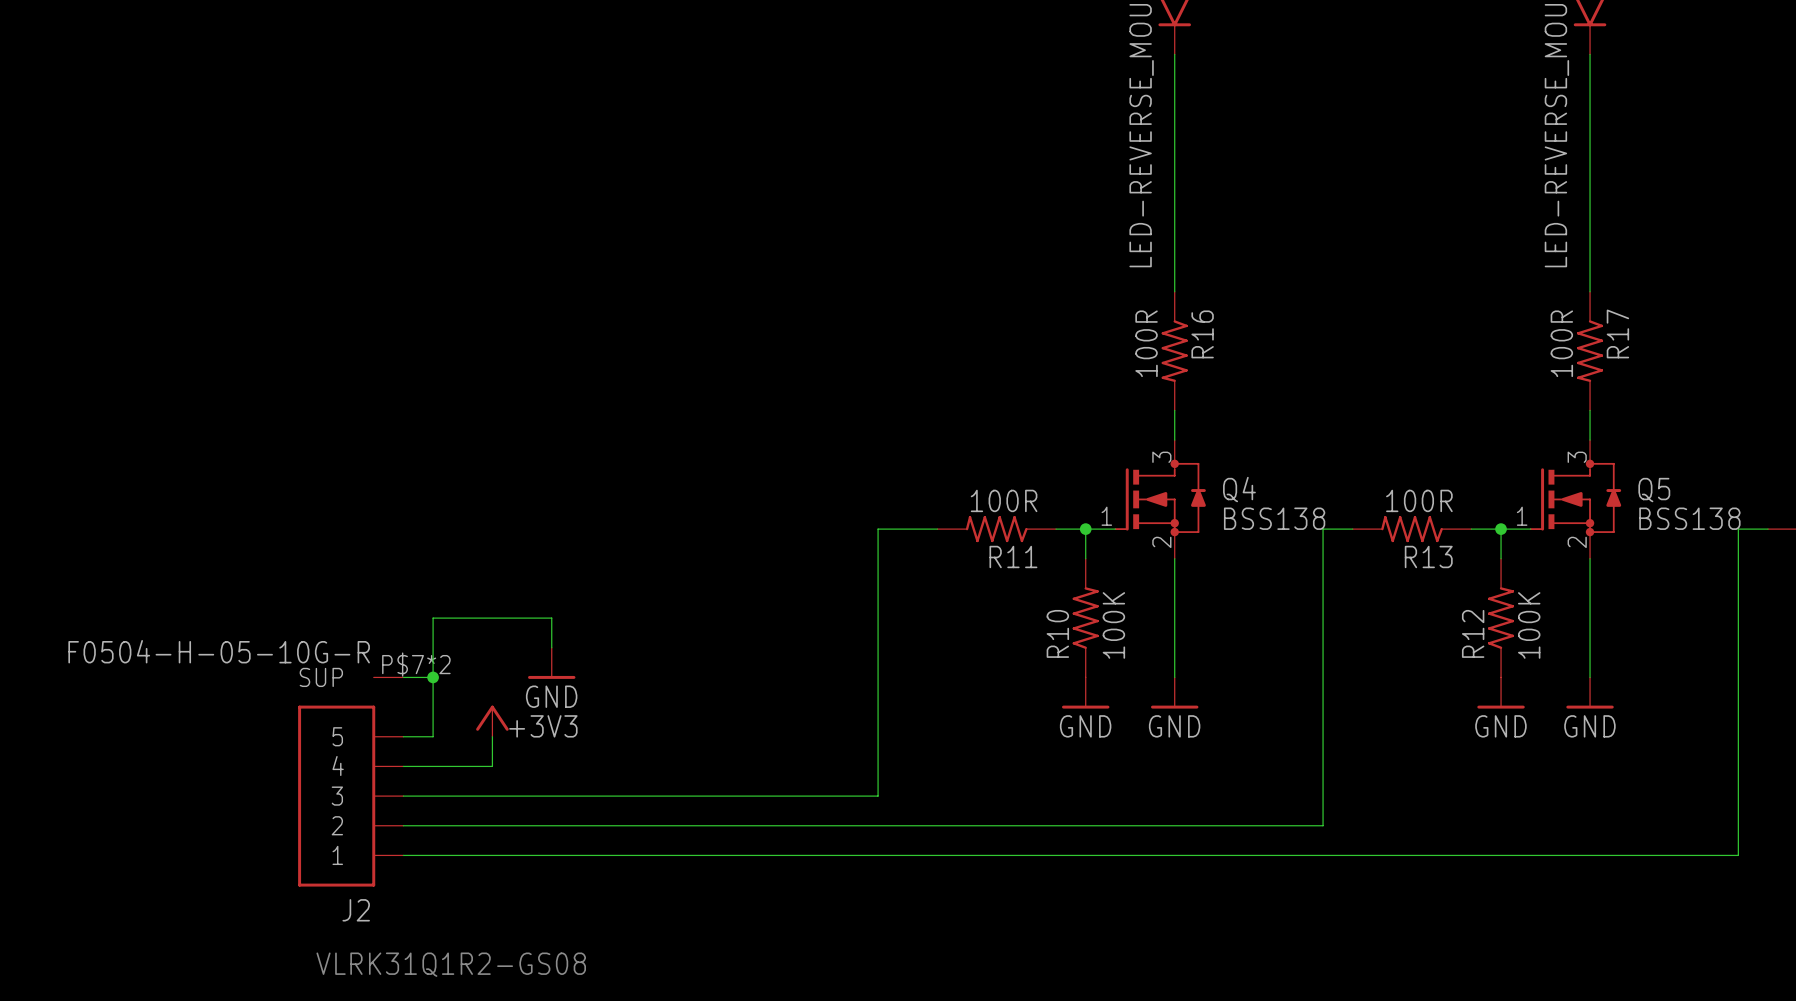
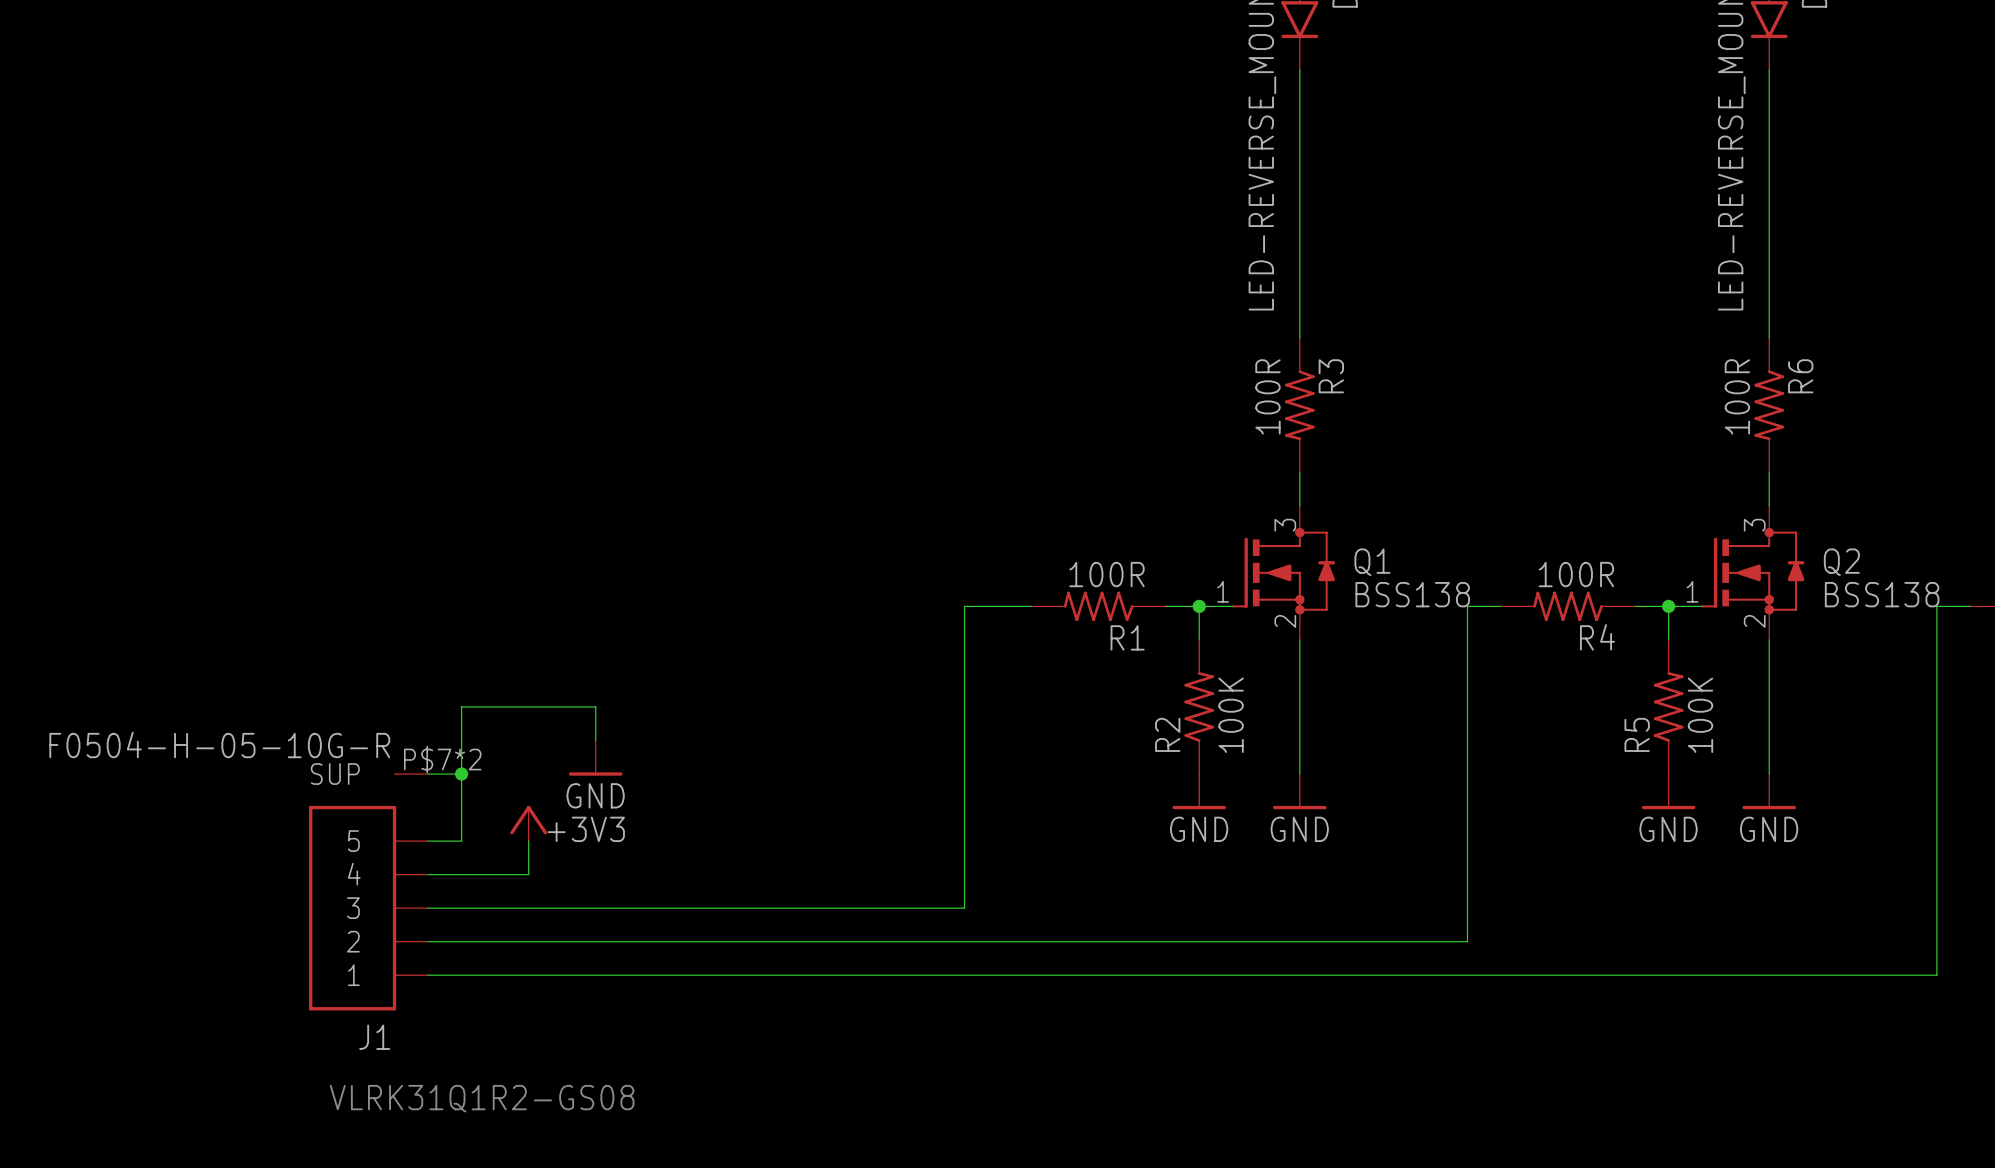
R17 name: R17 (1617, 333) -> R6 (1800, 376)
R16 name: R16 (1202, 334) -> R3 (1331, 376)
Q4 name: Q4 (1239, 489) -> Q1 (1372, 562)
Q5 name: Q5 (1654, 490) -> Q2 (1841, 562)
R11 name: R11 (1013, 556) -> R1 (1127, 637)
R13 name: R13 (1428, 556) -> R4 (1597, 637)
R10 name: R10 (1057, 633) -> R2 (1167, 734)
R12 name: R12 (1473, 633) -> R5 (1637, 734)
J2 name: J2 (356, 910) -> J1 (374, 1037)

